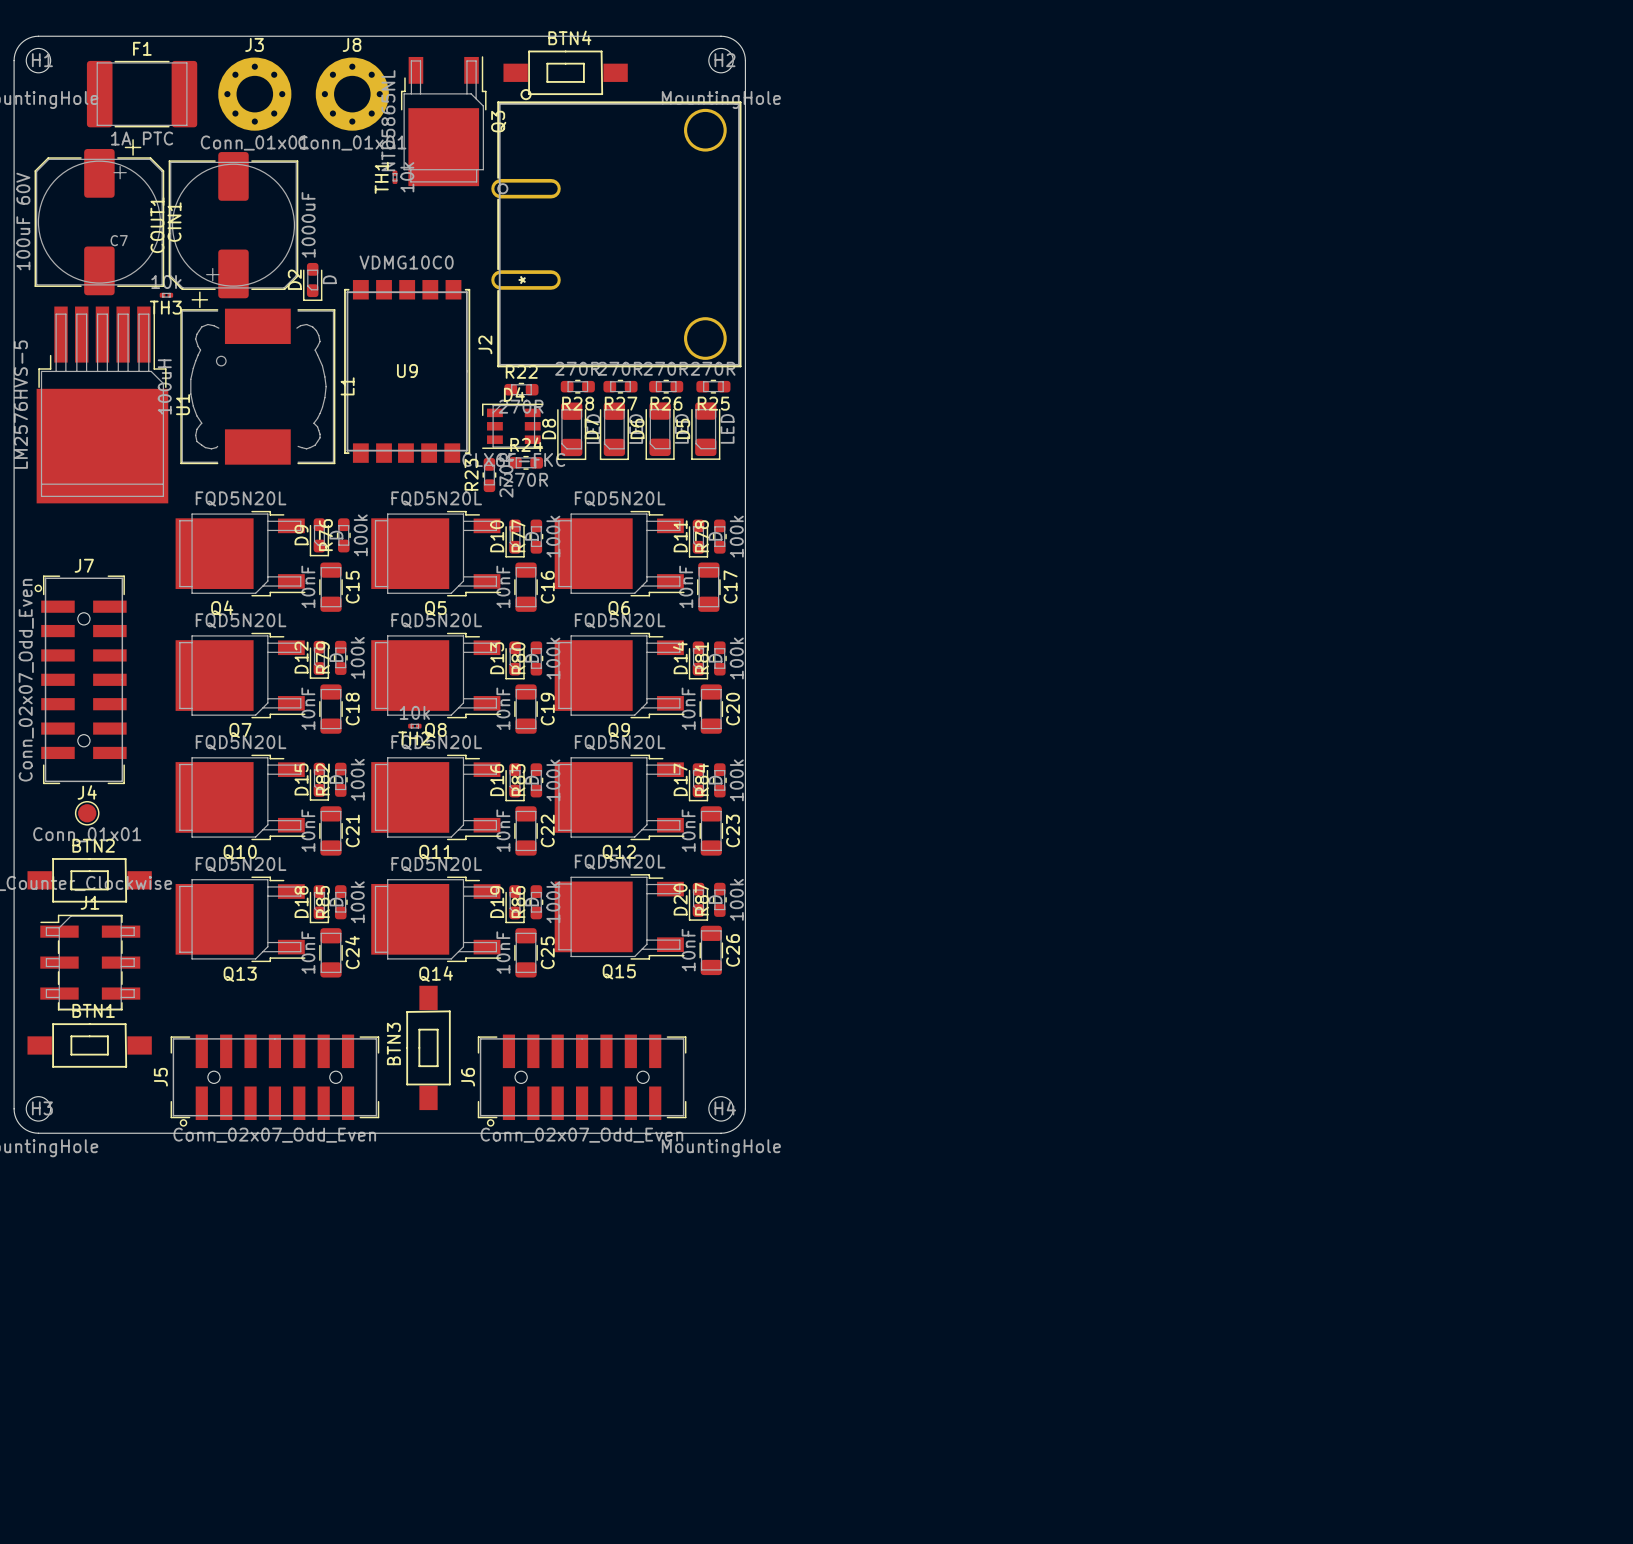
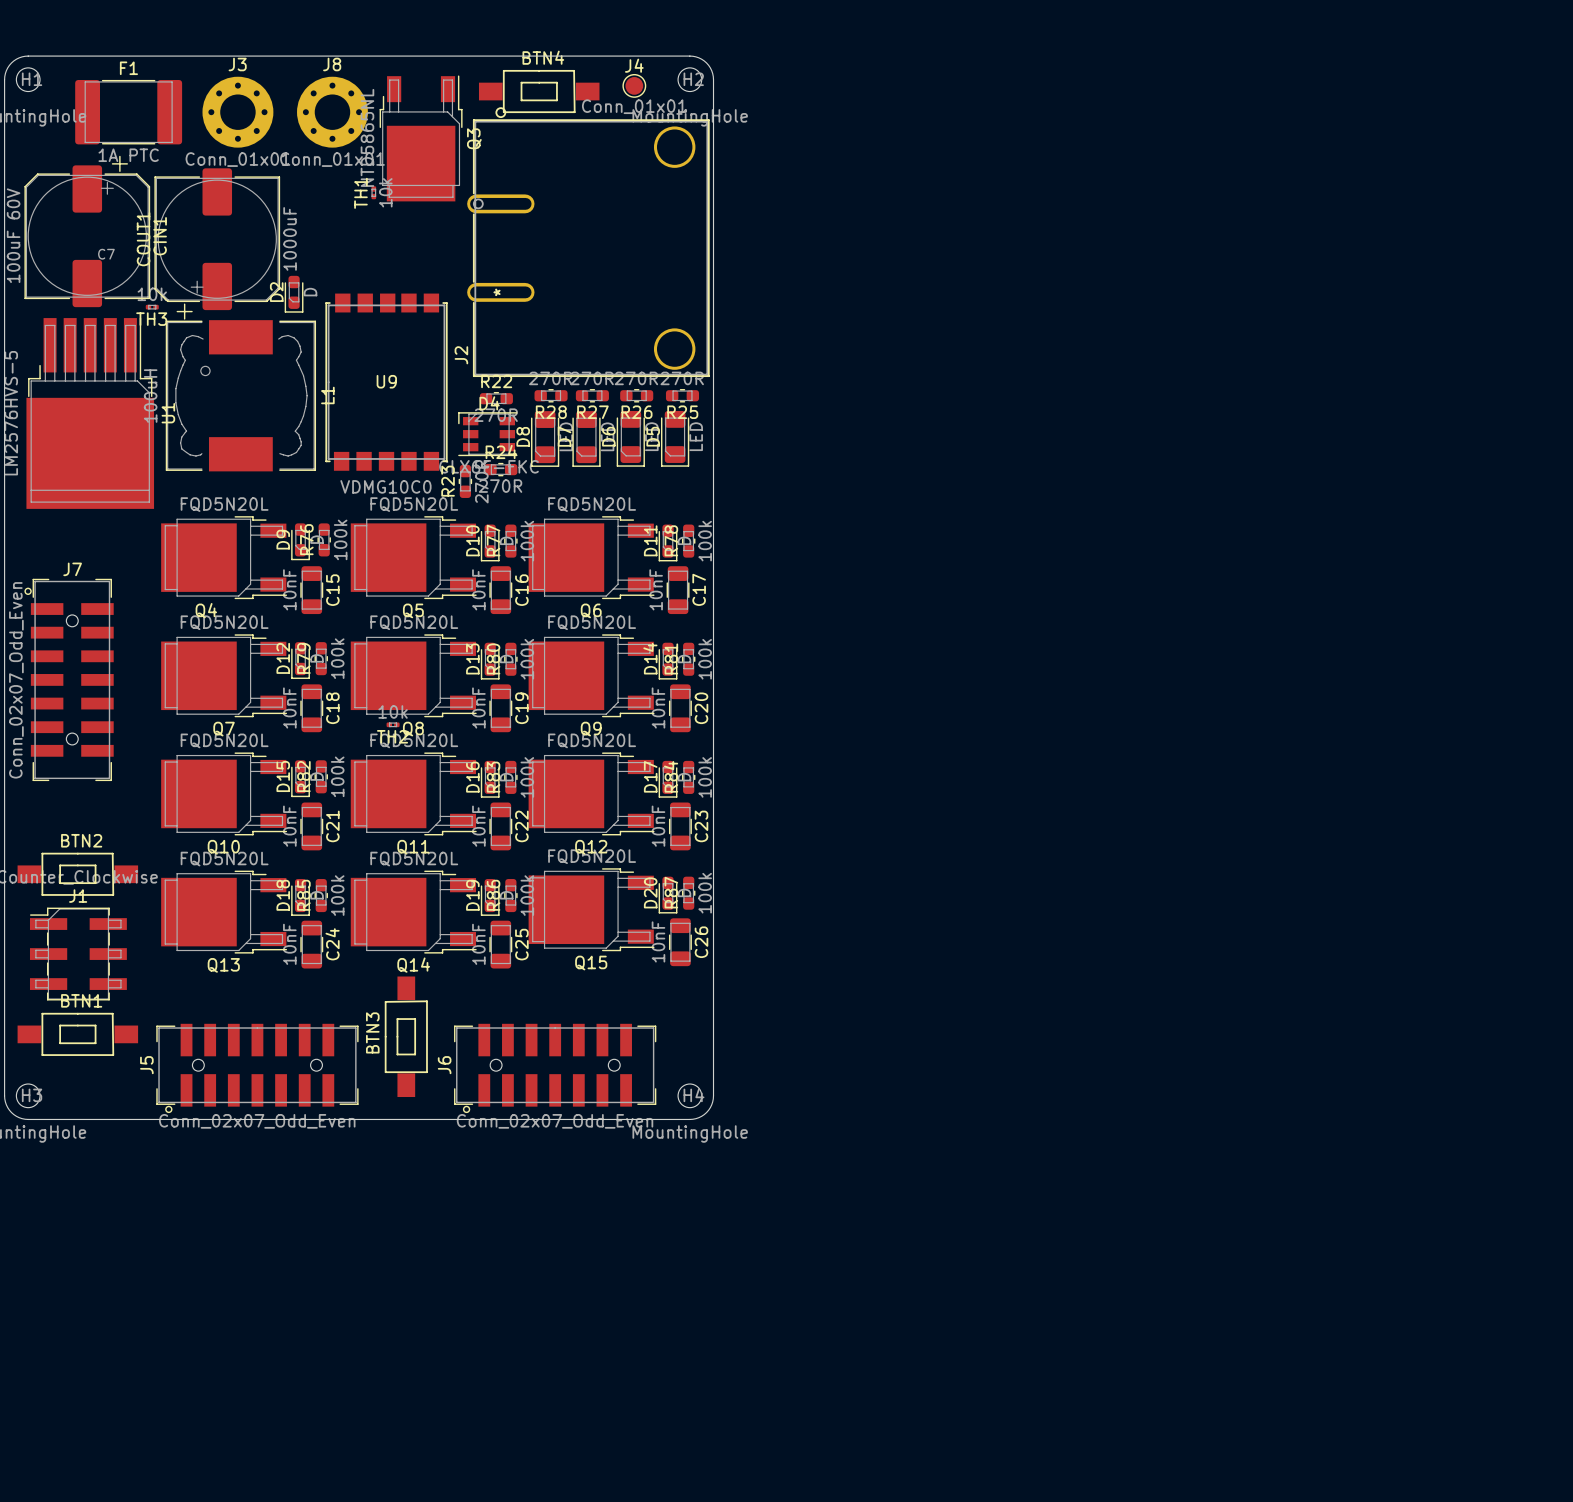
U9 rotation: 0° (407, 371) -> 180° (386, 382)
J4 position: (87, 813) -> (634, 85)

